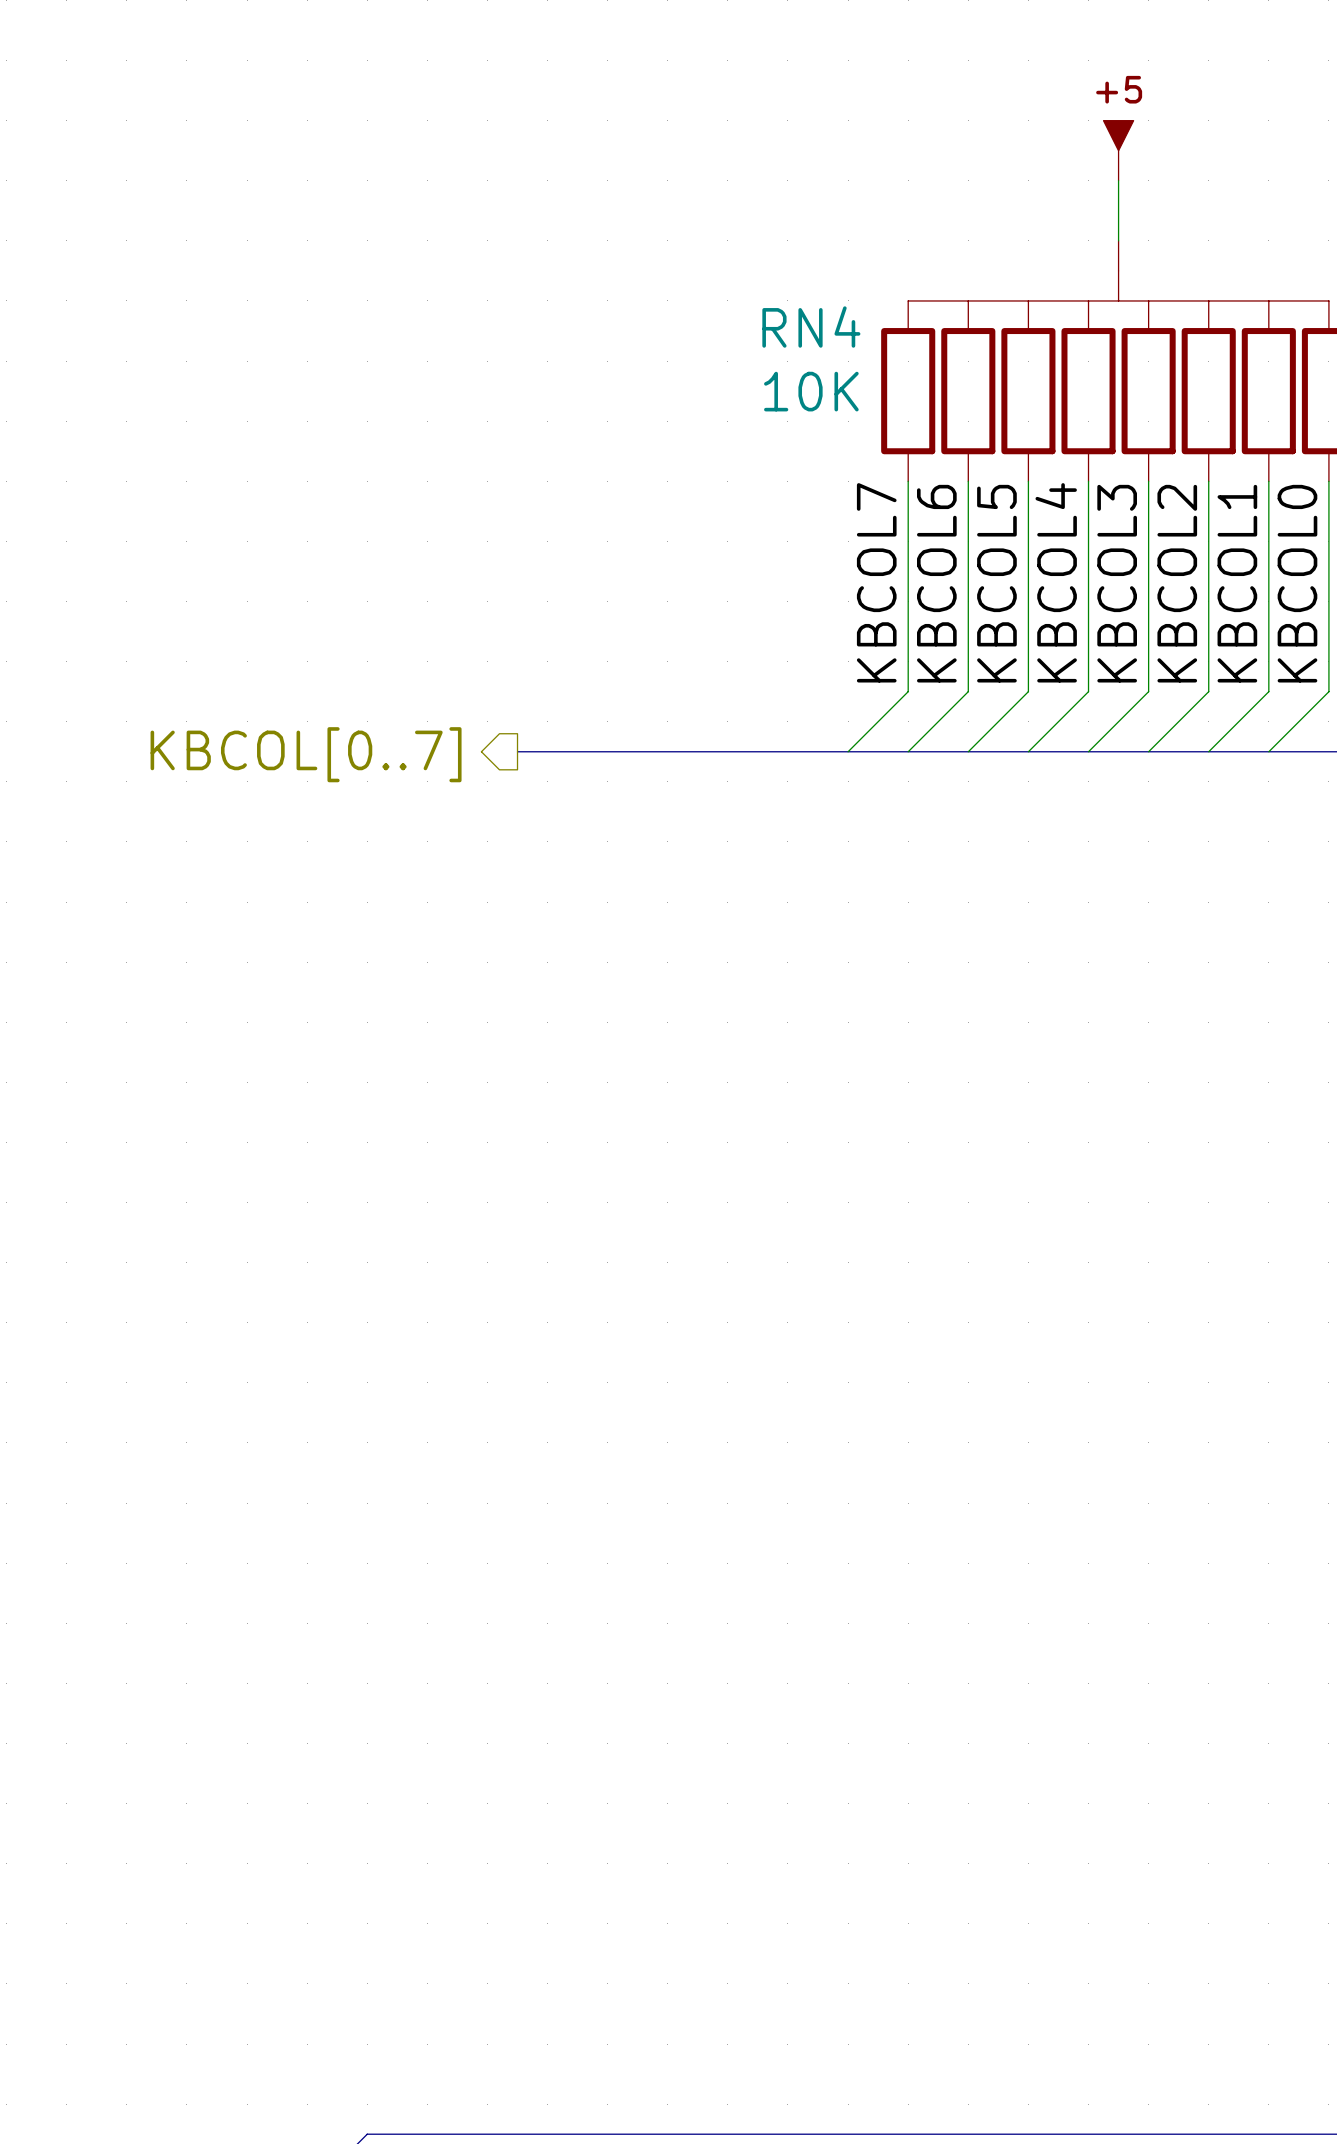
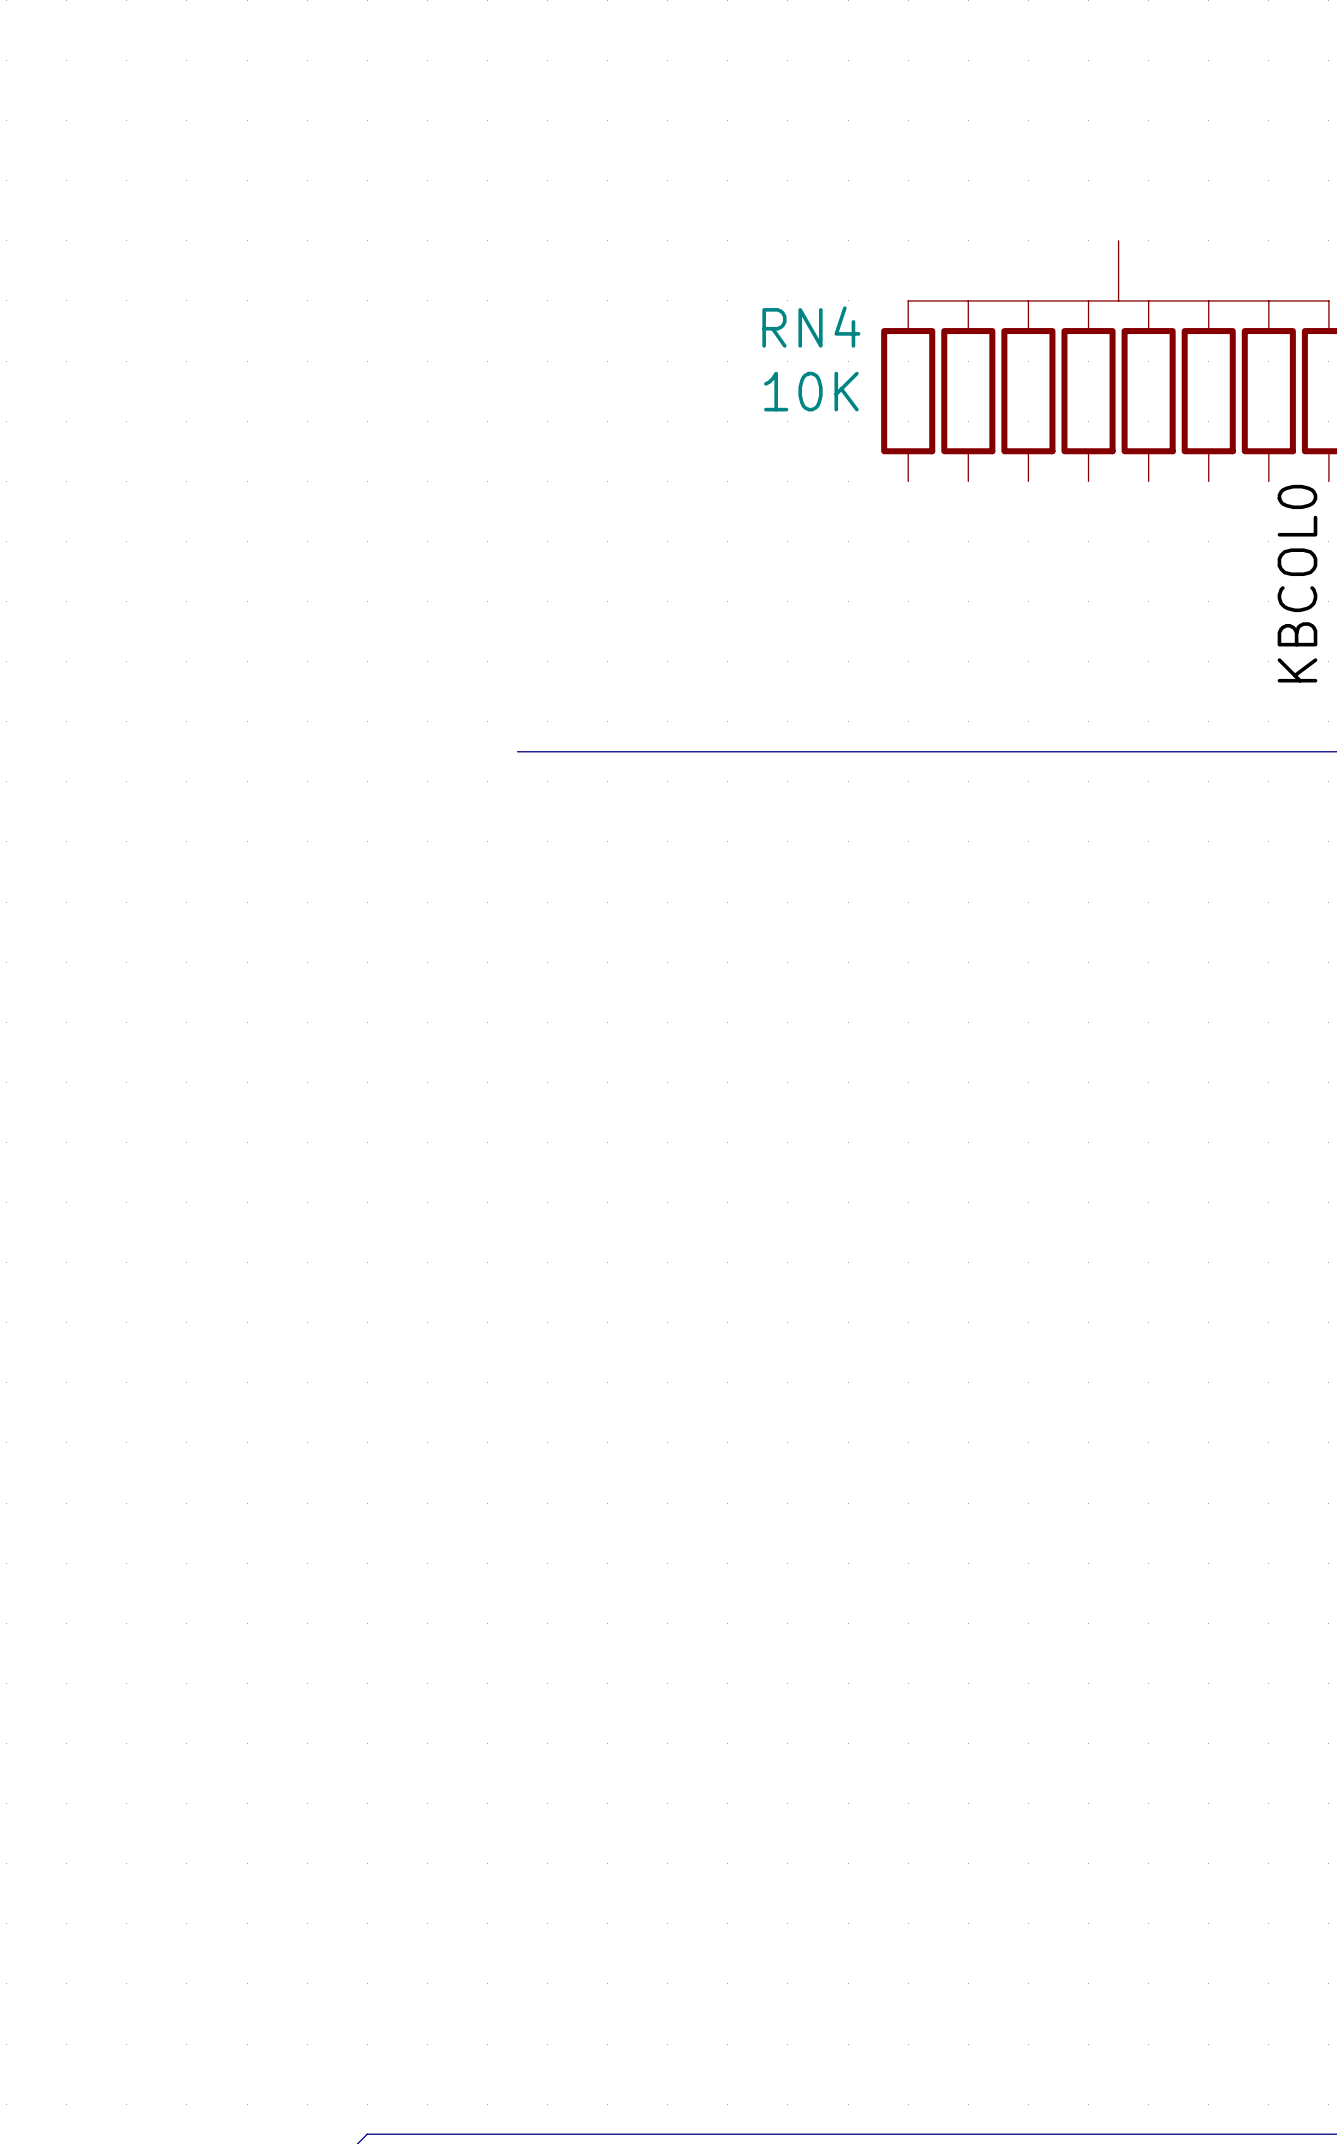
power symbol: (1118, 150) -> none
wire: (1118, 180) (1118, 240) -> none
wire: (908, 481) (908, 691) (848, 751) -> none
wire: (968, 481) (968, 691) (908, 751) -> none
wire: (1028, 481) (1028, 691) (968, 751) -> none
wire: (1088, 481) (1088, 691) (1028, 751) -> none
wire: (1148, 481) (1148, 691) (1088, 751) -> none
wire: (1208, 481) (1208, 691) (1148, 751) -> none
wire: (1268, 481) (1268, 691) (1208, 751) -> none
wire: (1328, 481) (1328, 691) (1268, 751) -> none
label: KBCOL7 (876, 582) -> none
label: KBCOL4 (1056, 582) -> none
label: KBCOL6 (936, 583) -> none
label: KBCOL5 (996, 583) -> none
label: KBCOL3 (1117, 583) -> none
label: KBCOL2 (1177, 583) -> none
label: KBCOL1 (1237, 583) -> none
hierarchical label: KBCOL[0..7] (306, 754) -> none

